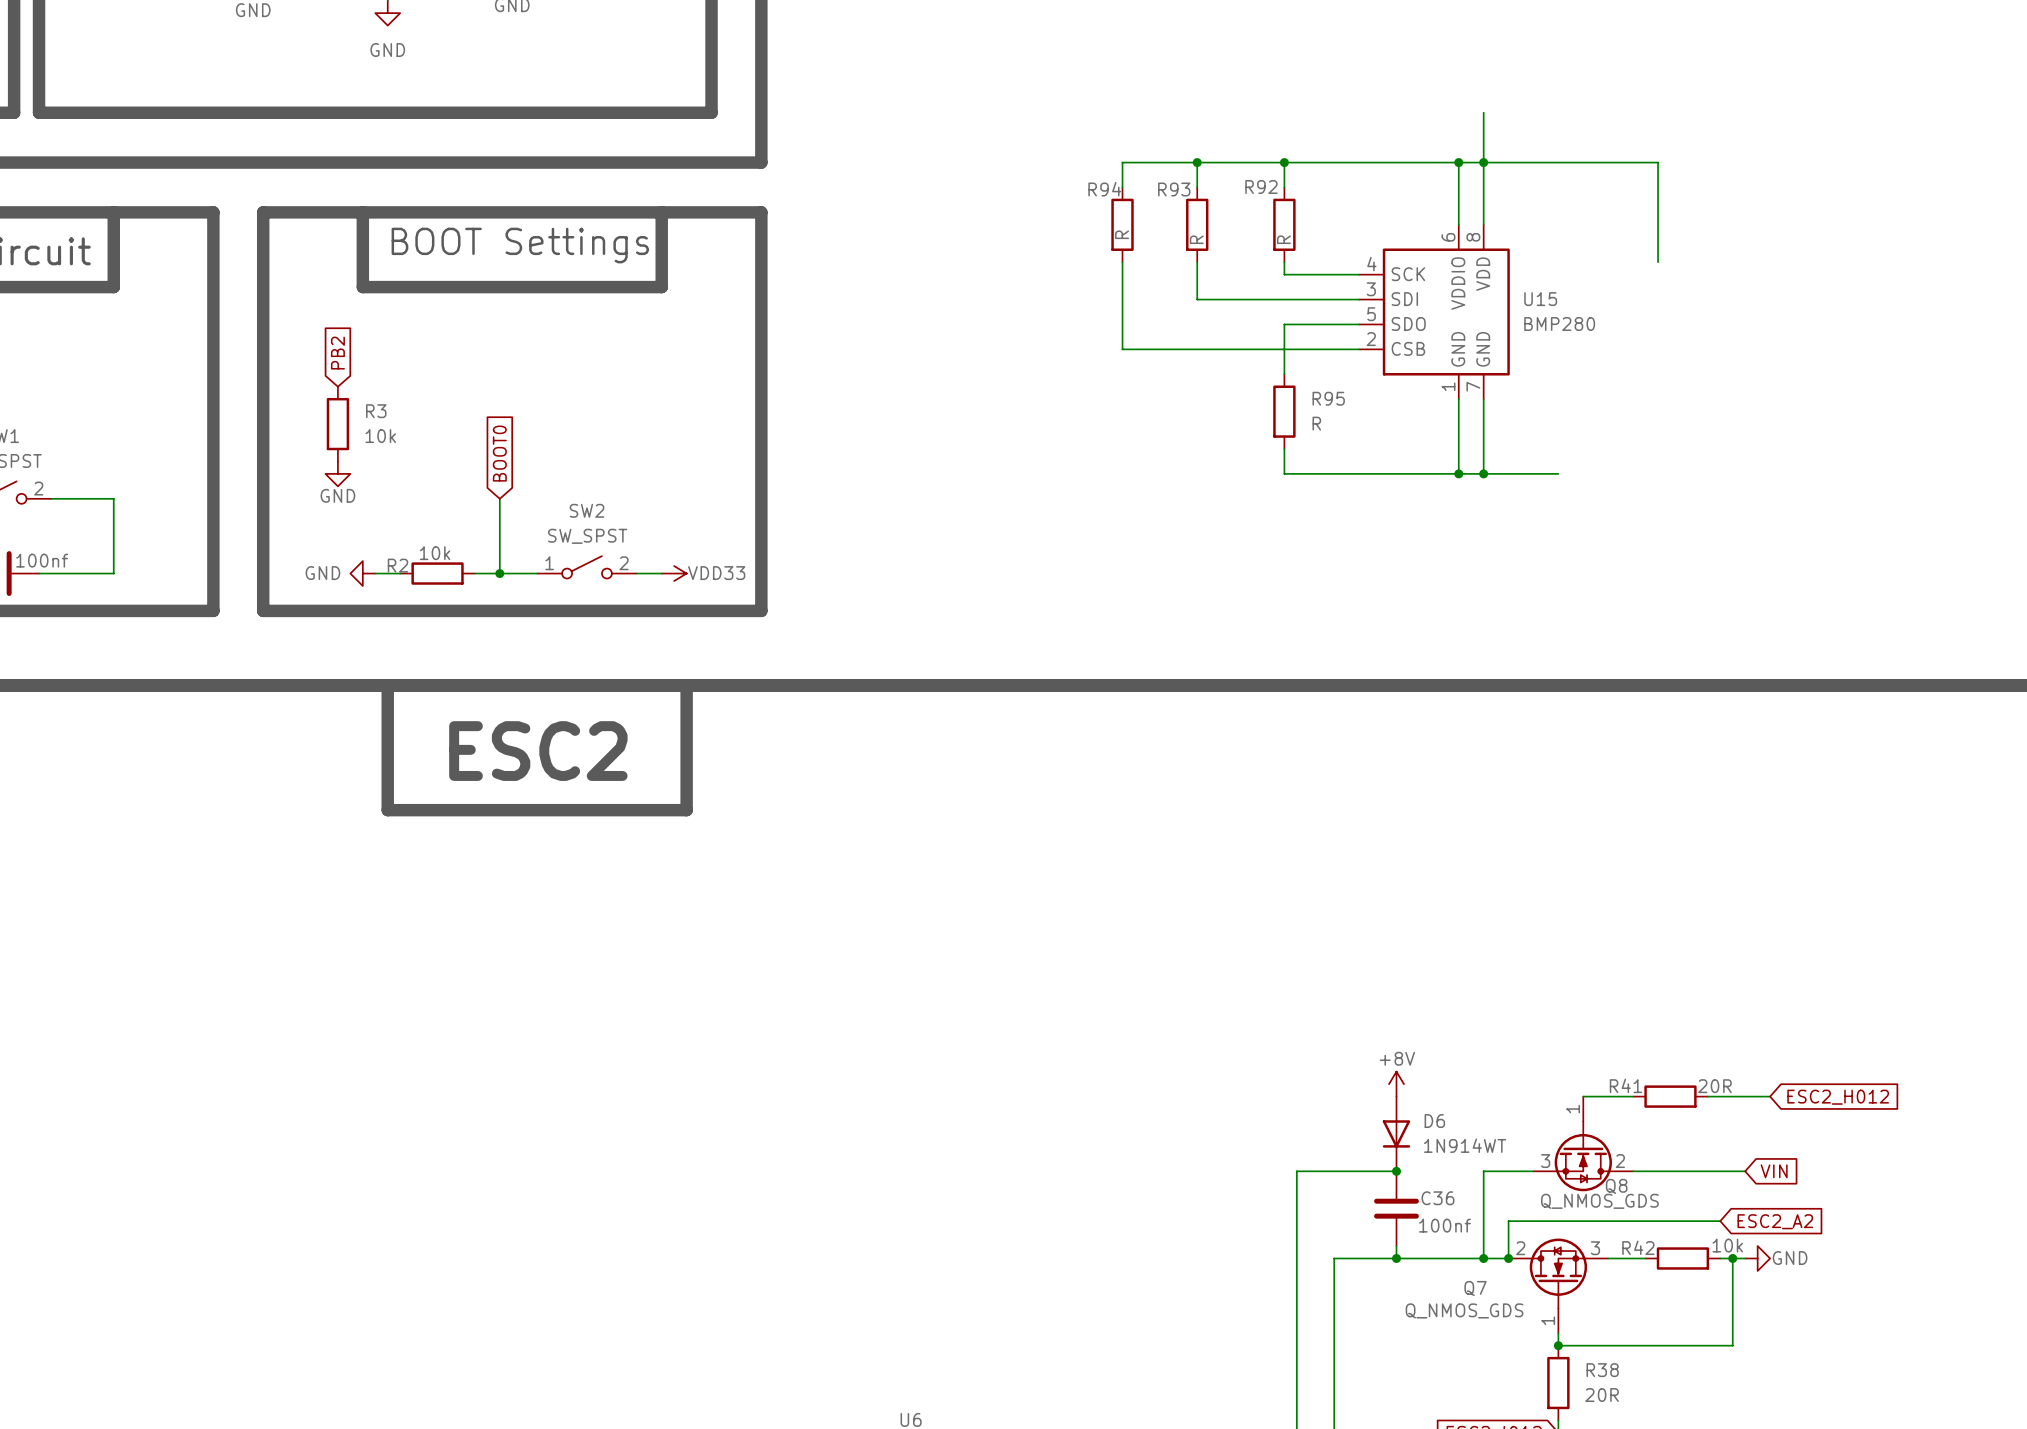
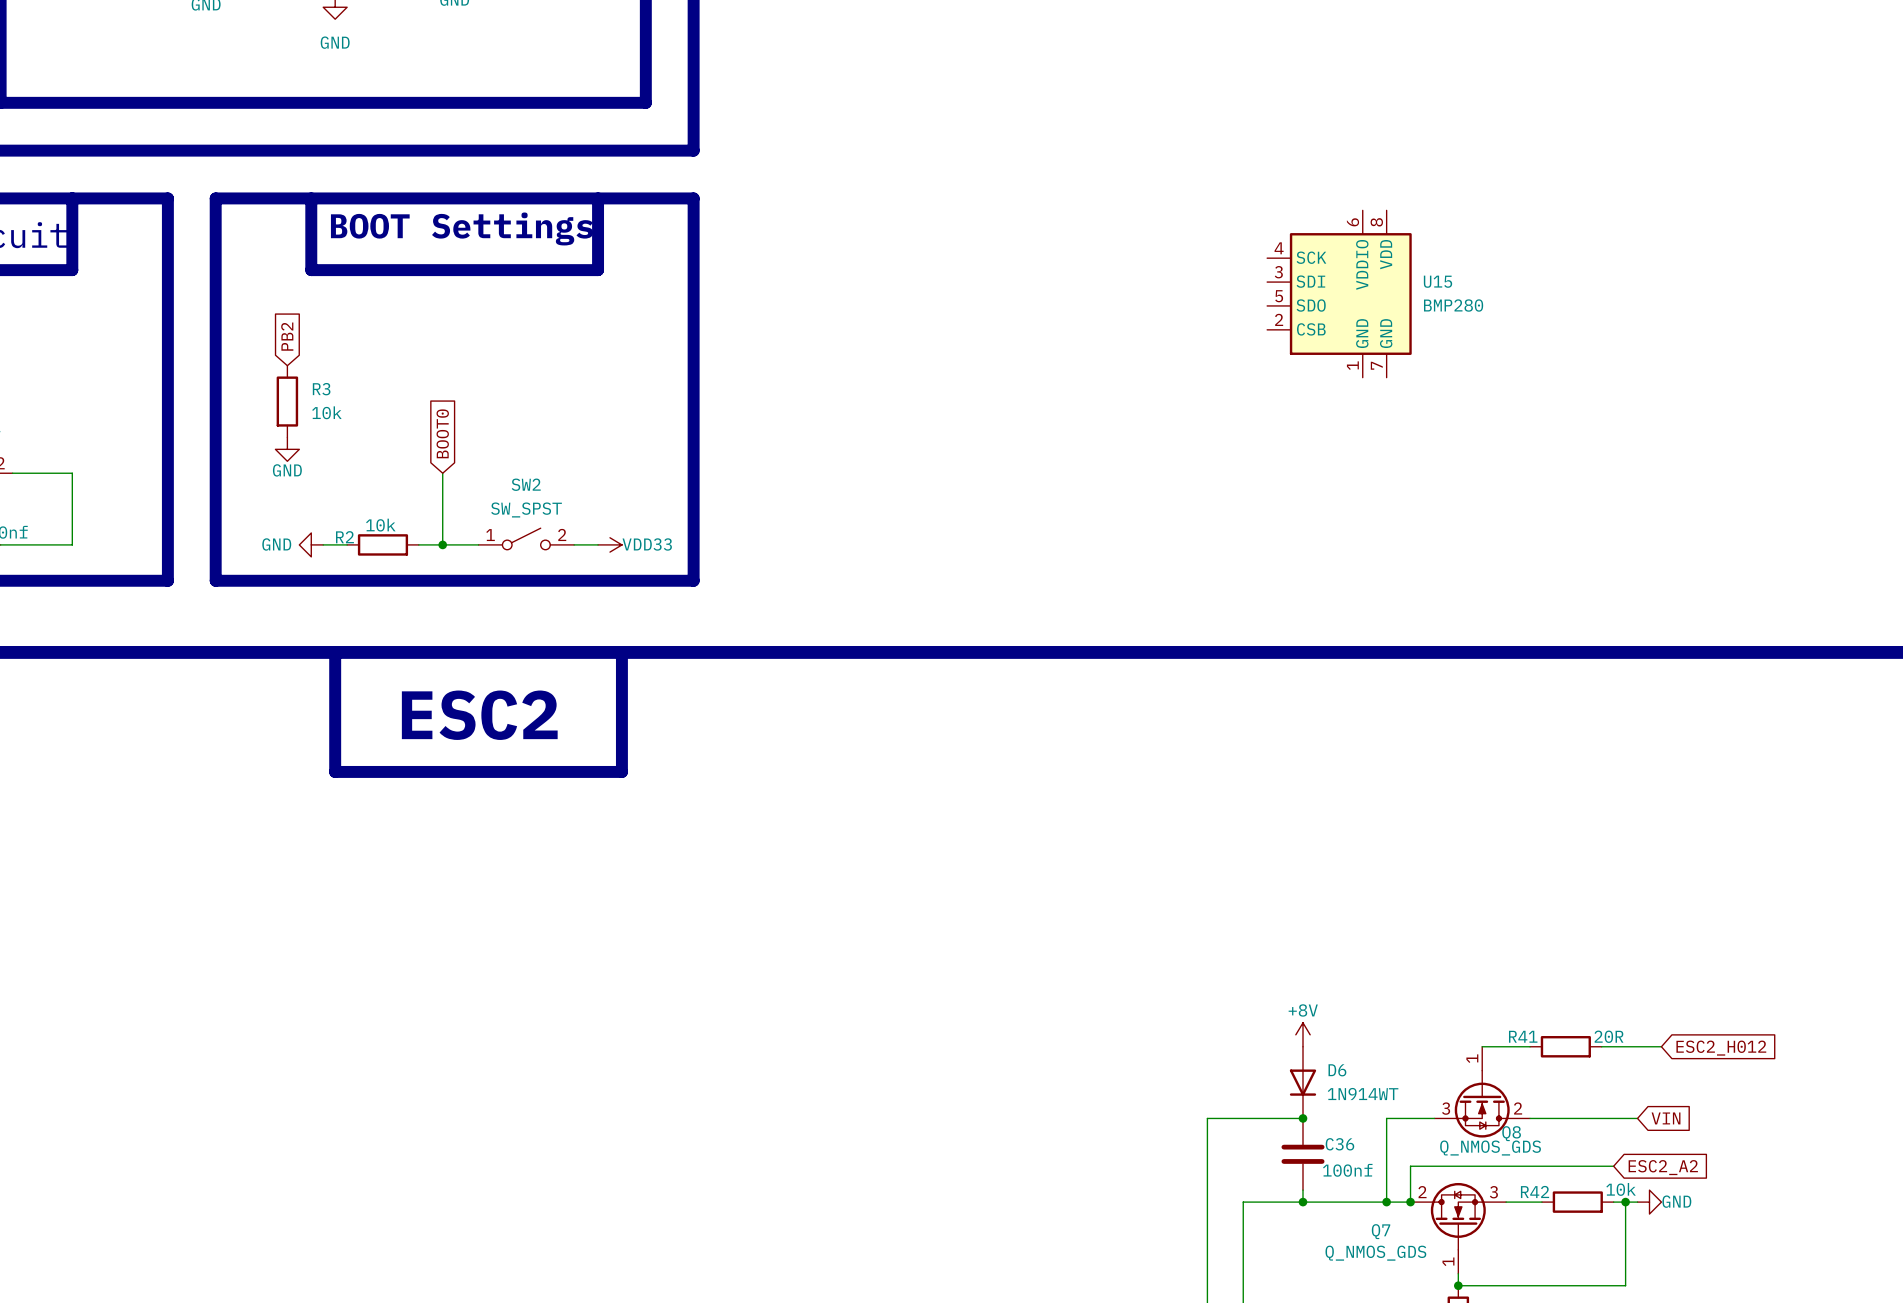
wire: (1483, 112) (1483, 224) -> none
wire: (1197, 162) (1197, 187) -> none
junction: (1197, 162) -> none
wire: (1284, 162) (1284, 187) -> none
junction: (1284, 162) -> none
wire: (1458, 162) (1458, 224) -> none
junction: (1458, 162) -> none
junction: (1483, 162) -> none
wire: (1122, 187) (1122, 162) (1658, 162) (1658, 262) -> none
R94: R (1122, 224) -> none
R93: R (1197, 224) -> none
R92: R (1284, 224) -> none
wire: (1122, 262) (1122, 349) (1359, 349) -> none
wire: (1197, 262) (1197, 299) (1359, 299) -> none
wire: (1284, 262) (1284, 274) (1359, 274) -> none
wire: (1359, 324) (1284, 324) (1284, 374) -> none
wire: (1458, 399) (1458, 473) -> none
wire: (1483, 399) (1483, 473) -> none
R95: R (1284, 411) -> none
wire: (1284, 449) (1284, 473) (1558, 473) -> none
junction: (1458, 473) -> none
junction: (1483, 473) -> none

